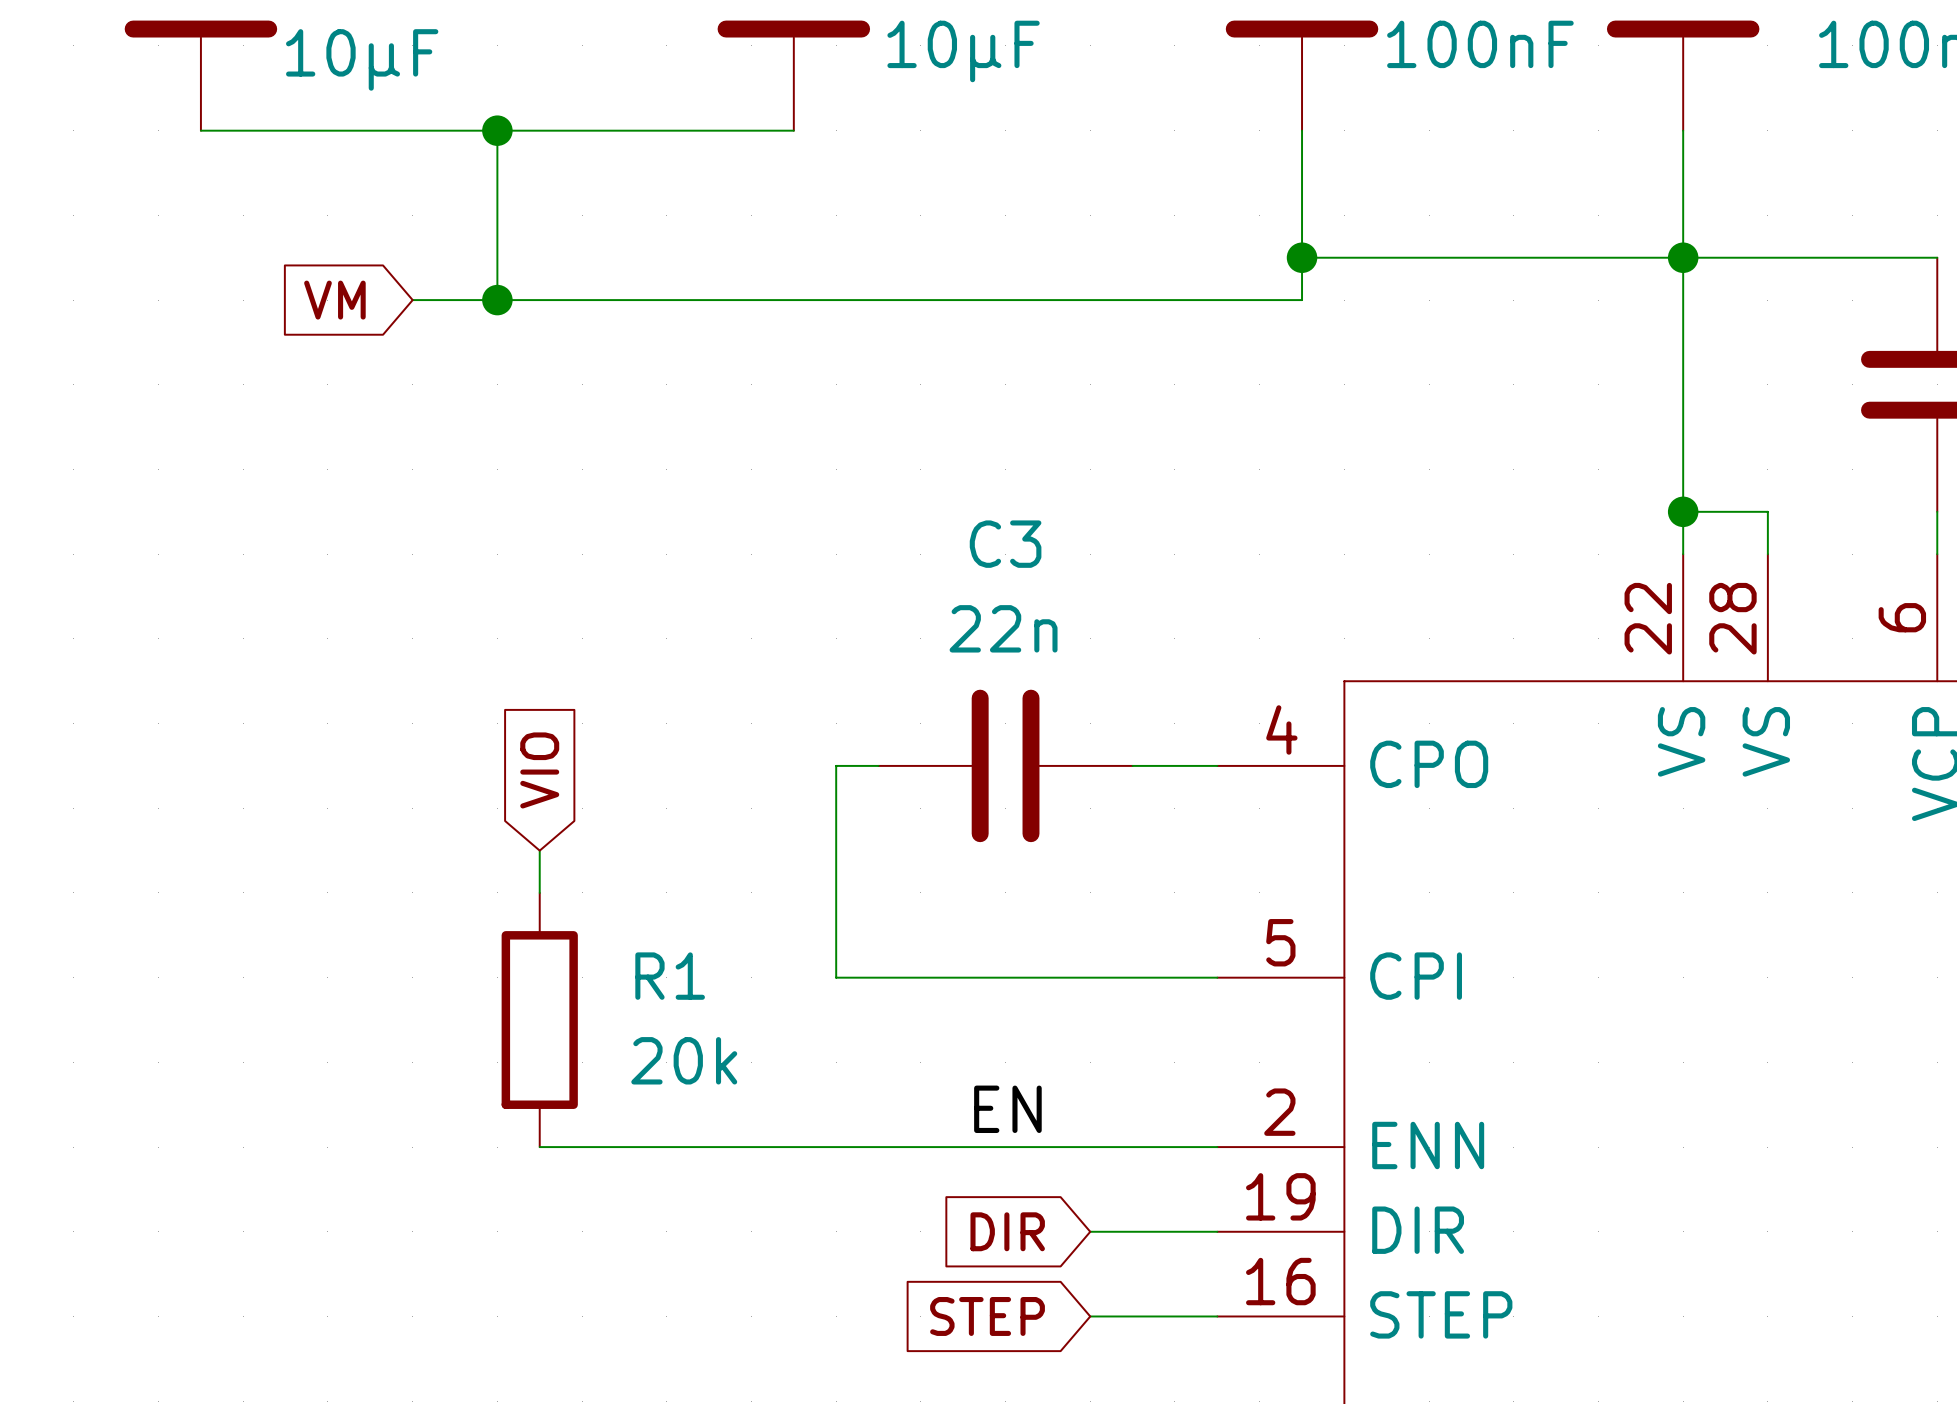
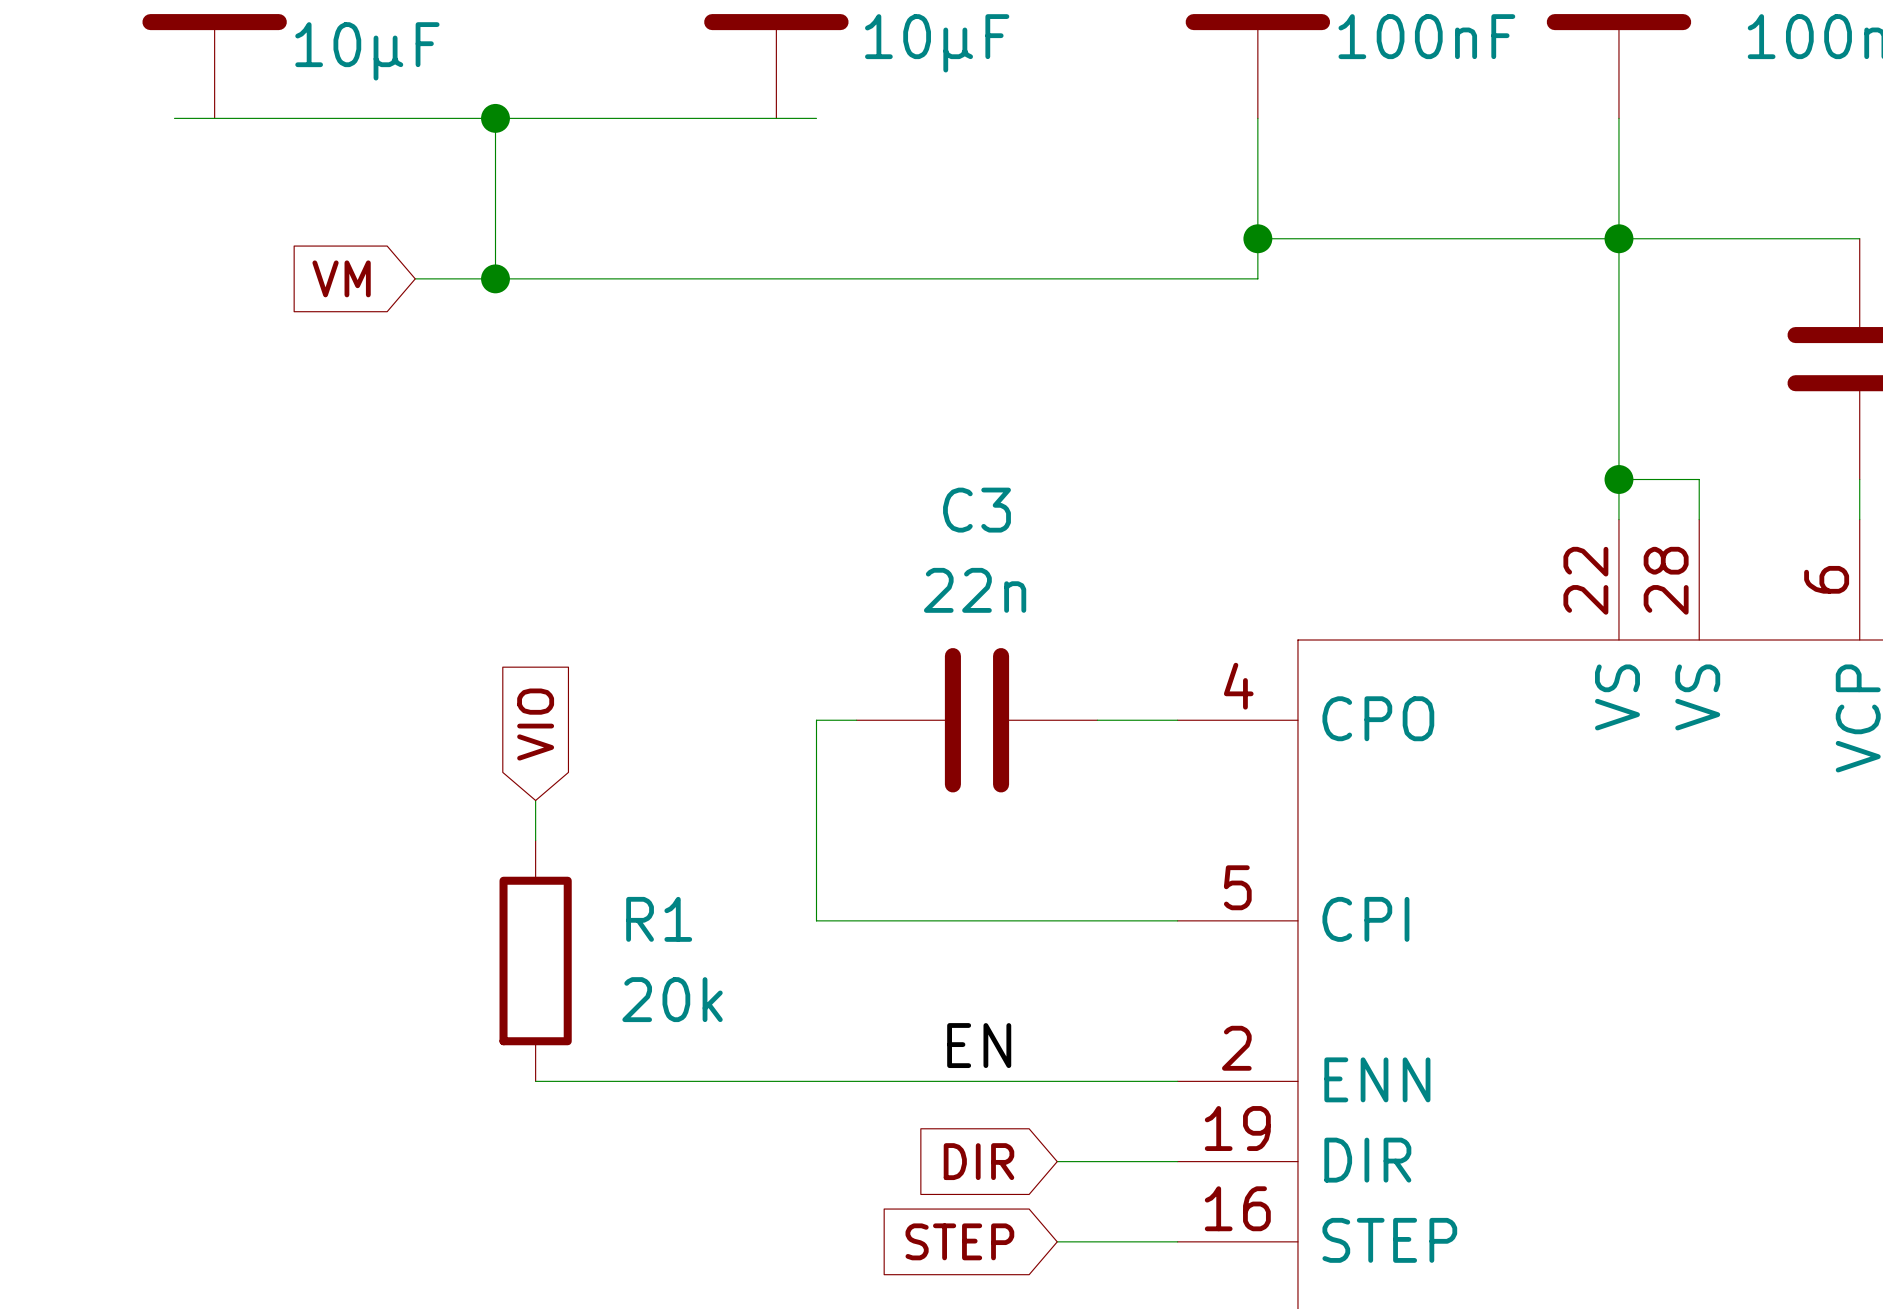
wire: none -> (174, 118) (214, 118)
wire: none -> (776, 118) (816, 118)

